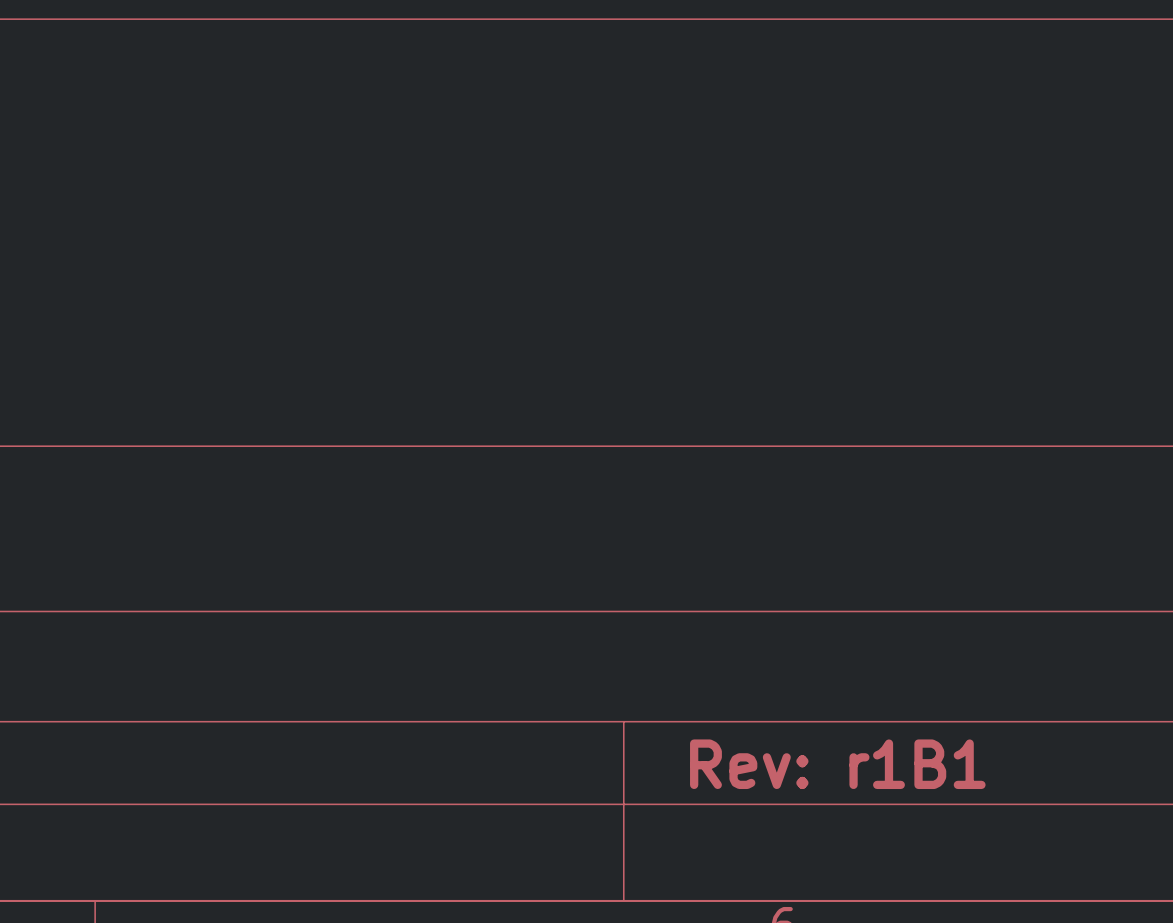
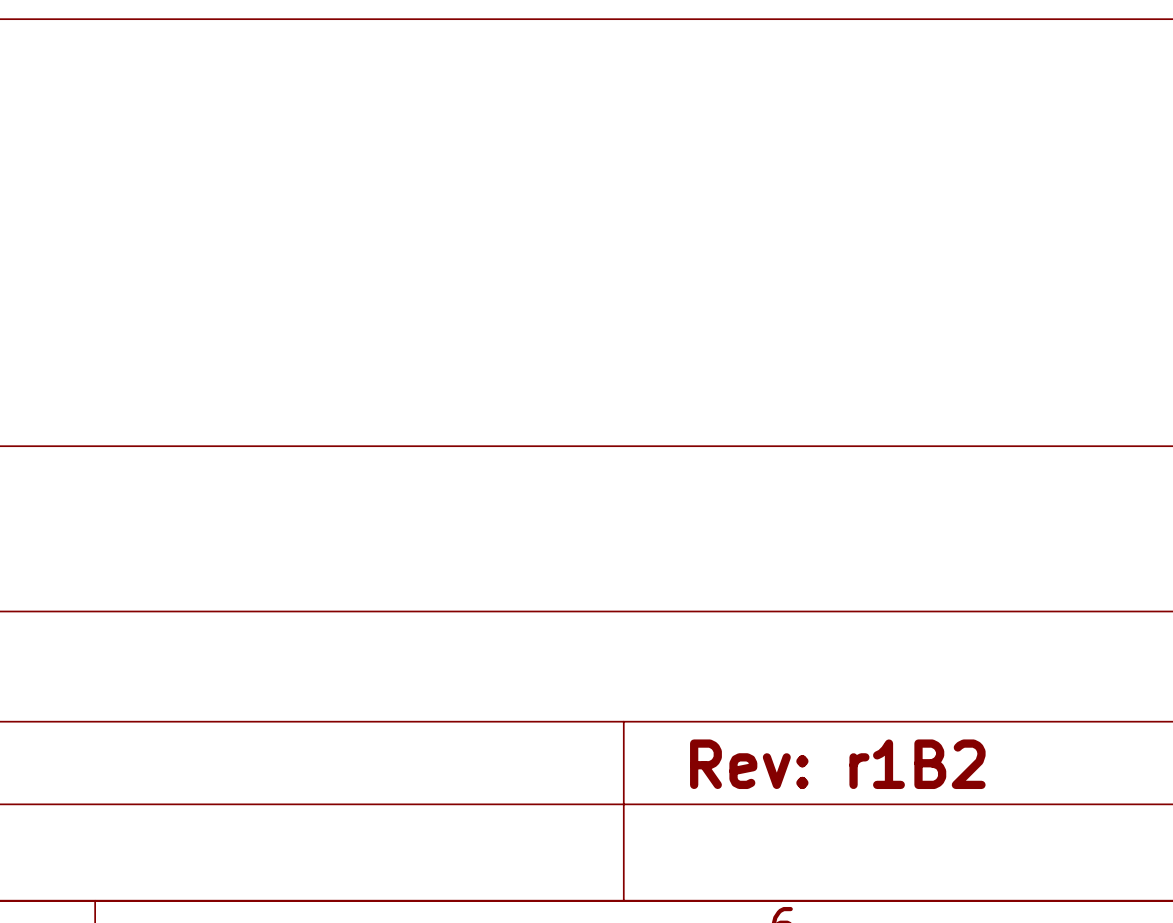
title block: Rev: r1B1 (837, 764) -> Rev: r1B2 (837, 764)

